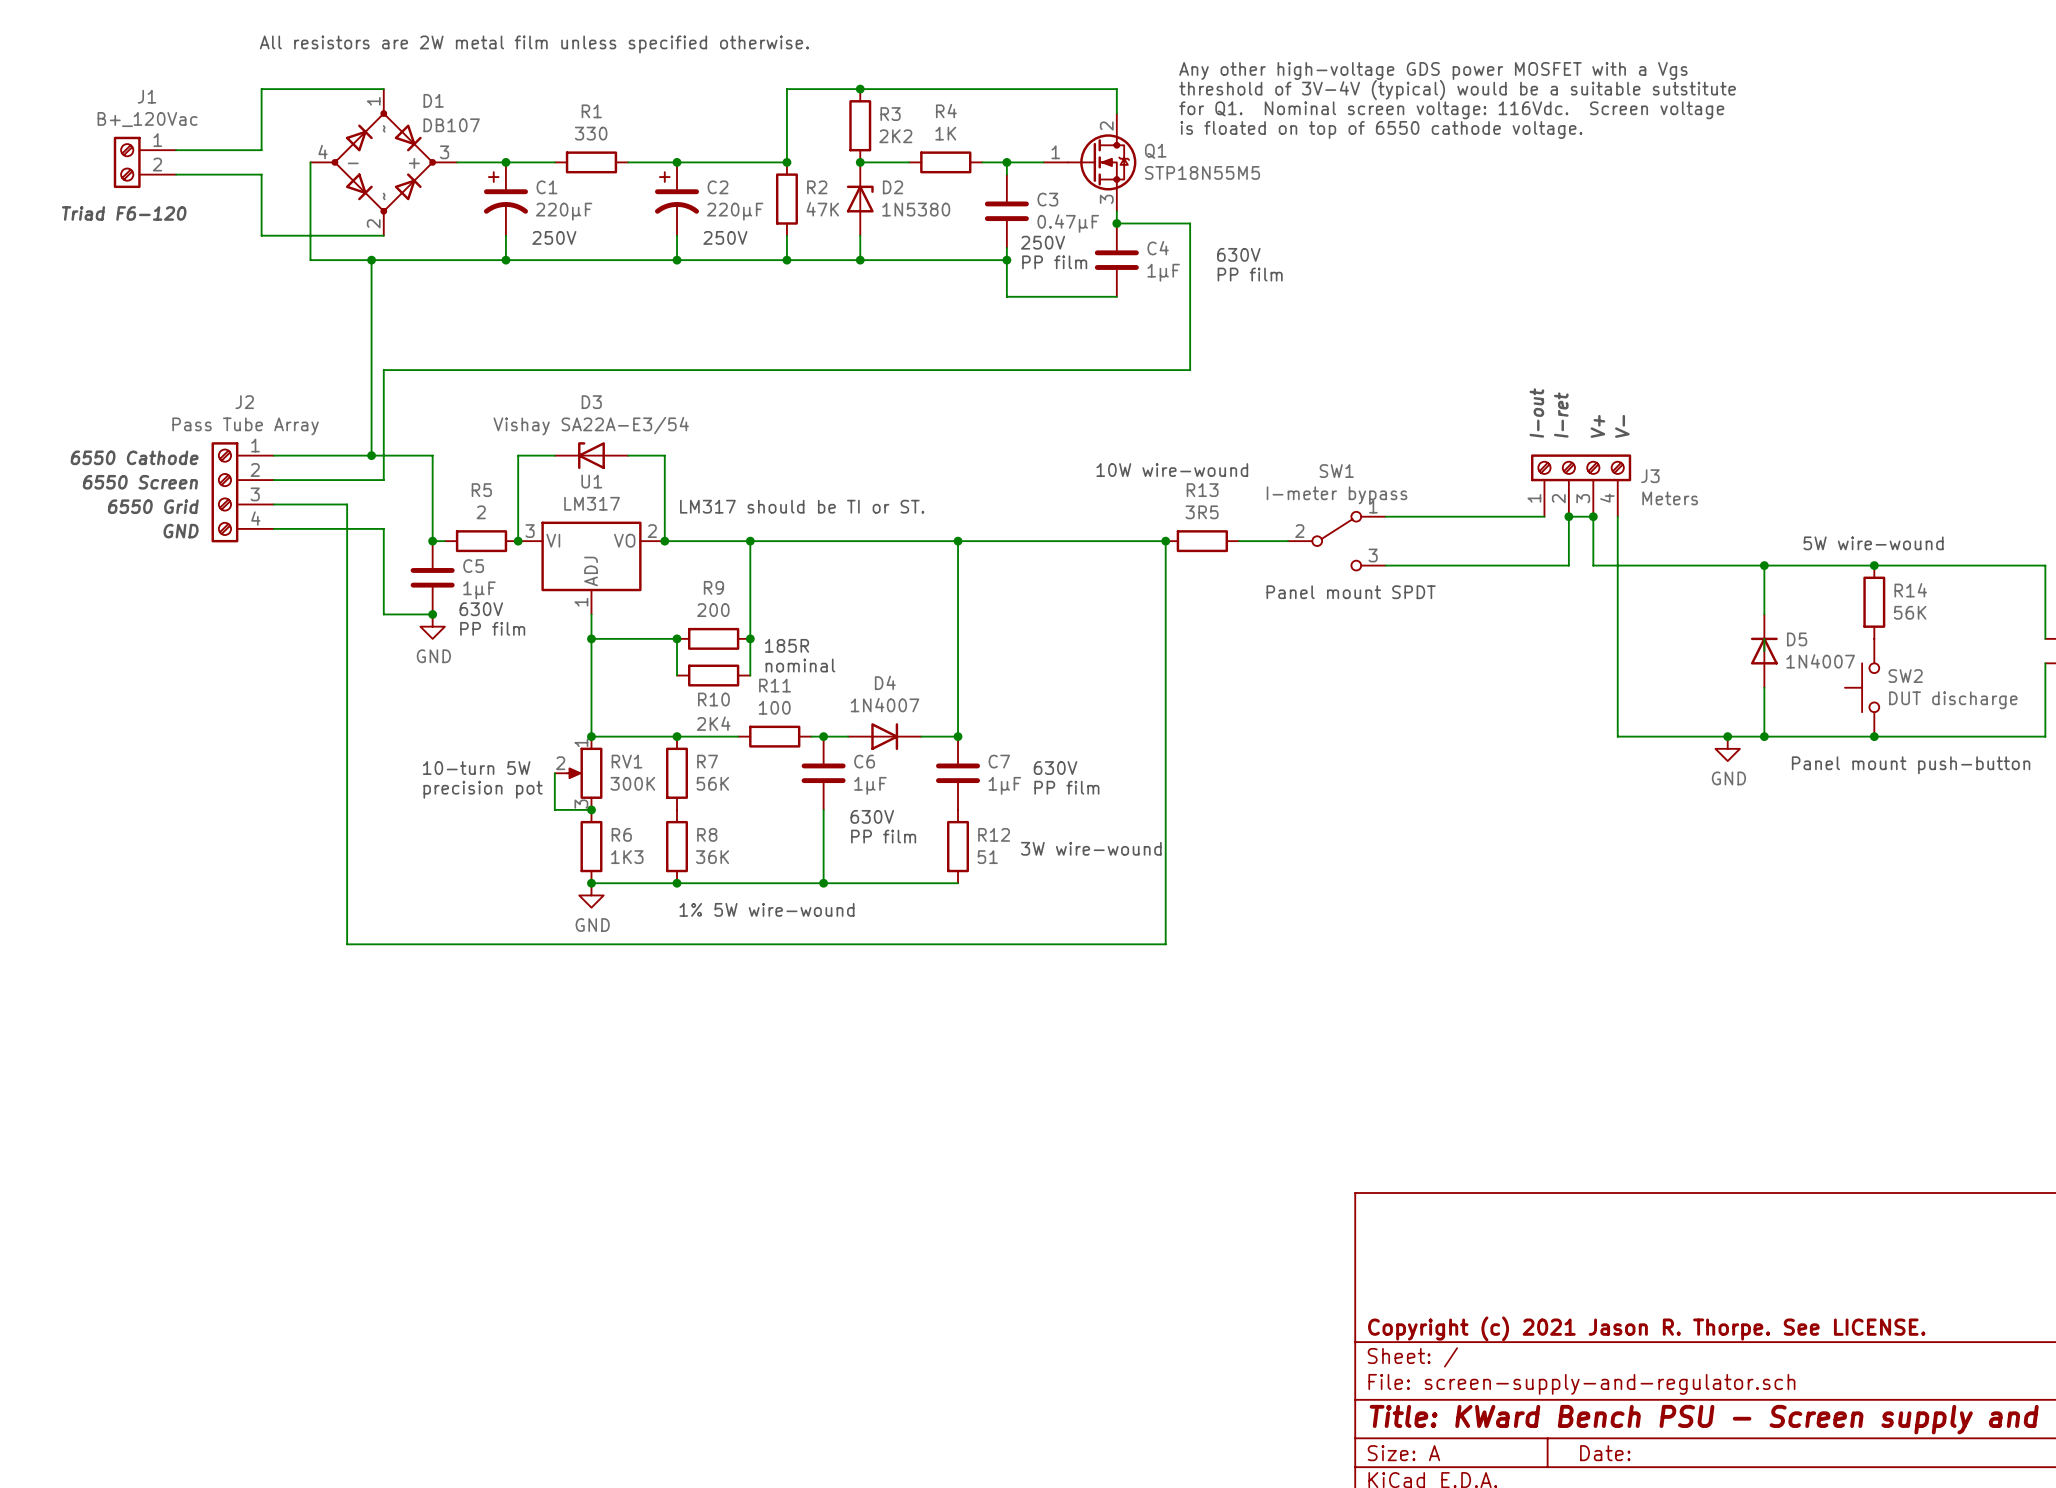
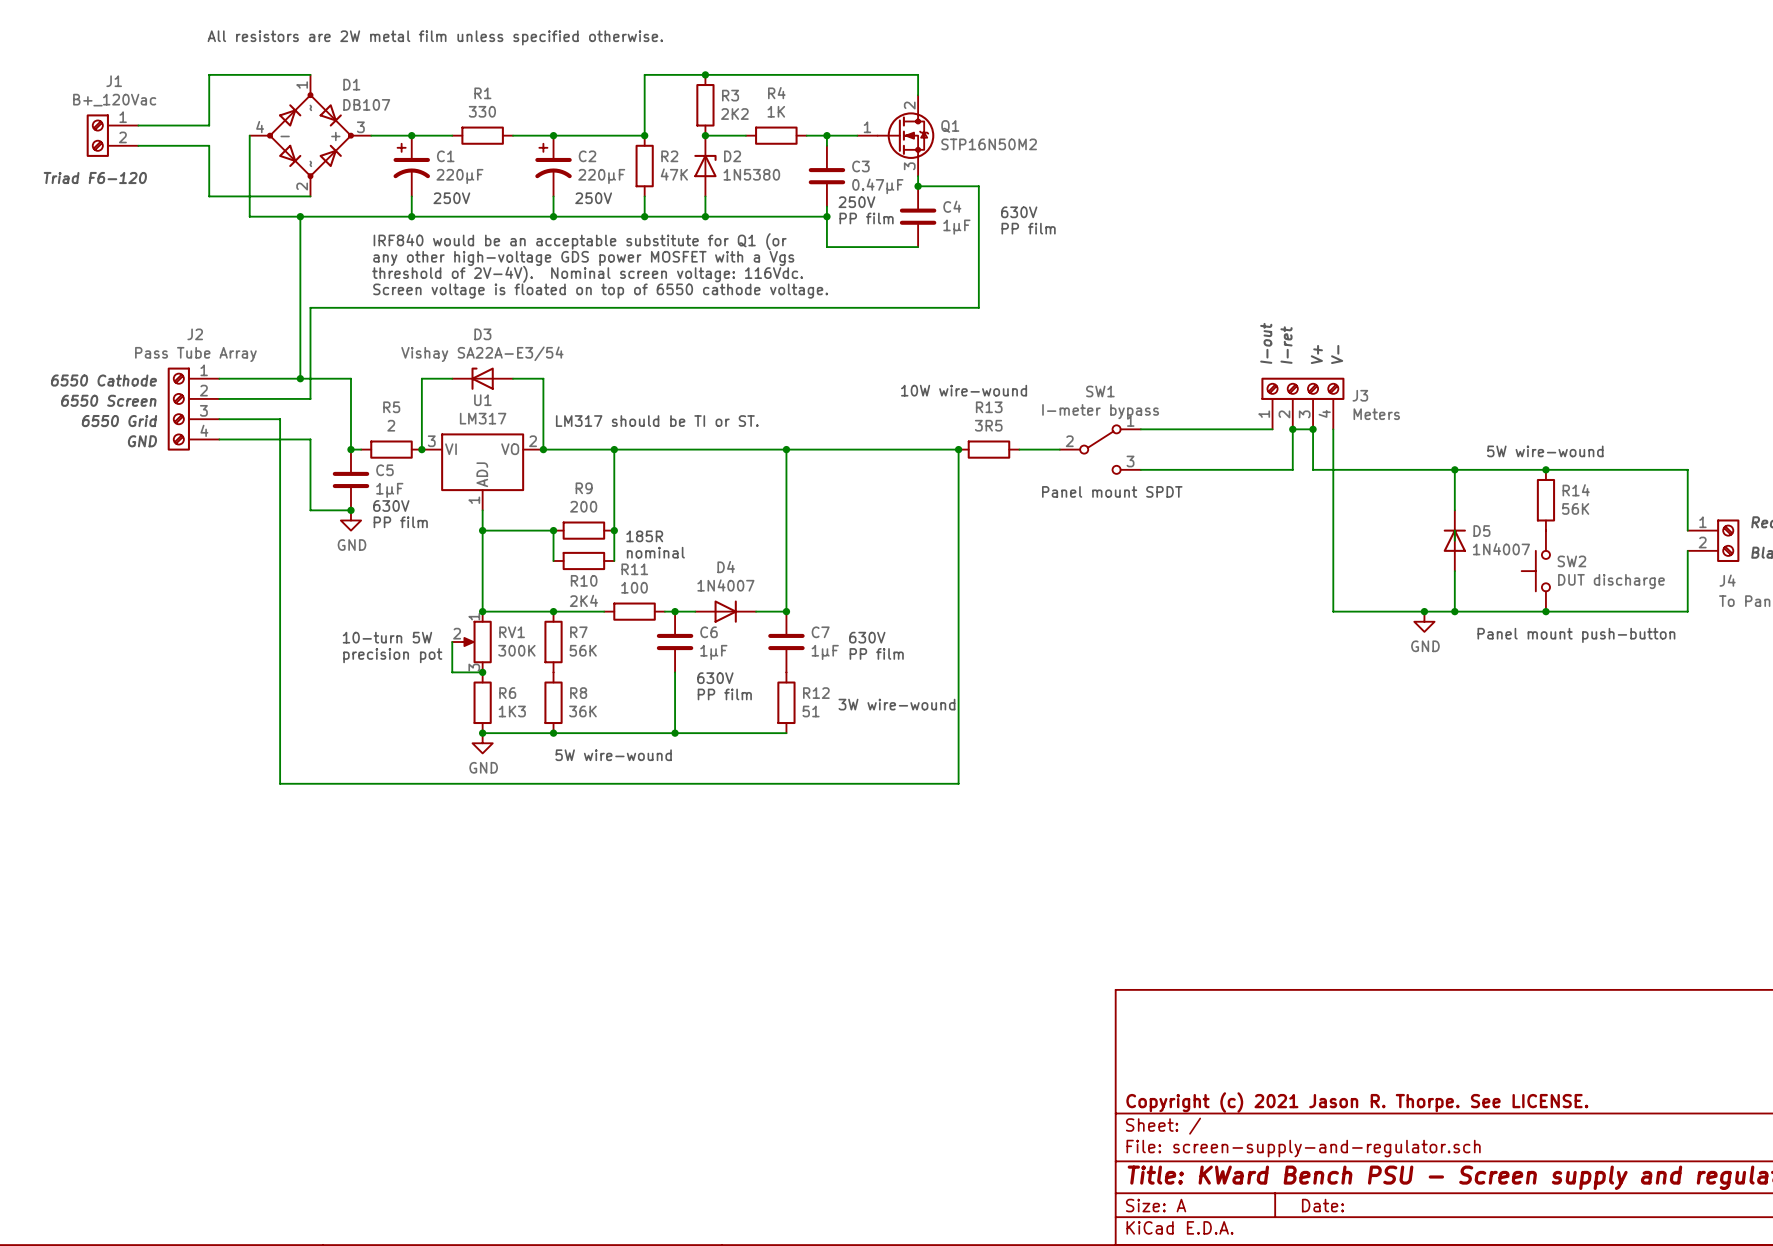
text: Any other high-voltage GDS power MOSFET with a Vgs (1433, 70) -> none
text: threshold of 3V-4V (typical) would be a suitable sutstitute (1457, 90) -> none
text: for Q1. Nominal screen voltage: 116Vdc. Screen voltage (1451, 110) -> none
text: is floated on top of 6550 cathode voltage. (1381, 129) -> none
Q1 value: STP18N55M5 (1202, 172) -> STP16N50M2 (989, 144)
text: none -> IRF840 would be an acceptable substitute for Q1 (or (580, 241)
text: none -> any other high-voltage GDS power MOSFET with a Vgs (583, 258)
text: none -> threshold of 2V-4V). Nominal screen voltage: 116Vdc. (587, 274)
text: none -> Screen voltage is floated on top of 6550 cathode voltage. (600, 291)
text: 1% 5W wire-wound (766, 909) -> 5W wire-wound (613, 755)

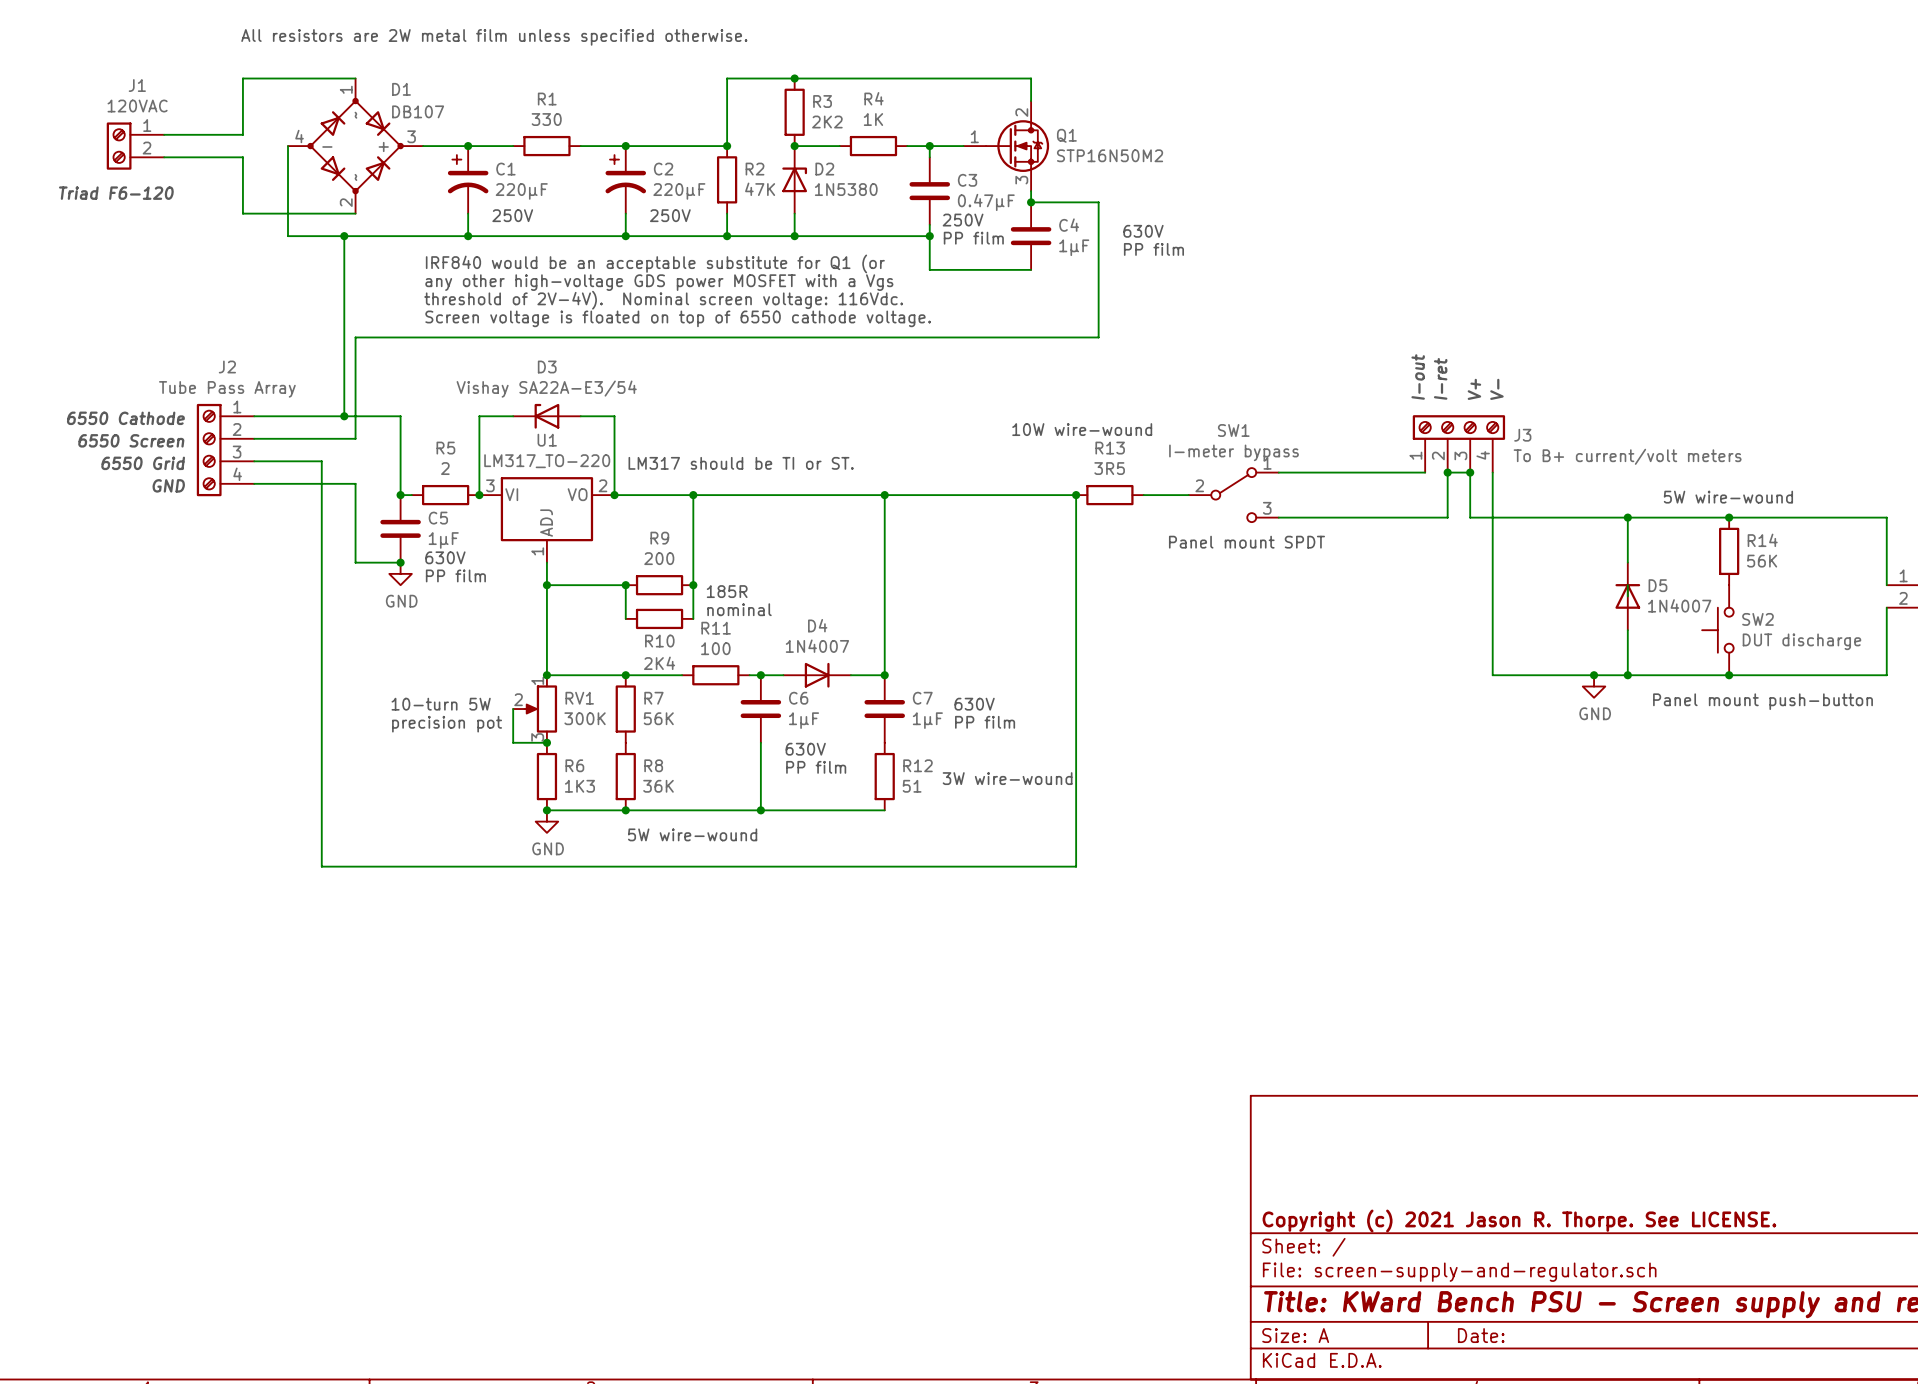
J1 value: B+_120Vac (114, 100) -> 120VAC (137, 106)
J2 value: Pass Tube Array (195, 354) -> Tube Pass Array (227, 389)
J3 value: Meters (1376, 414) -> To B+ current/volt meters (1627, 456)
U1 value: LM317 (483, 418) -> LM317_TO-220 (547, 461)

